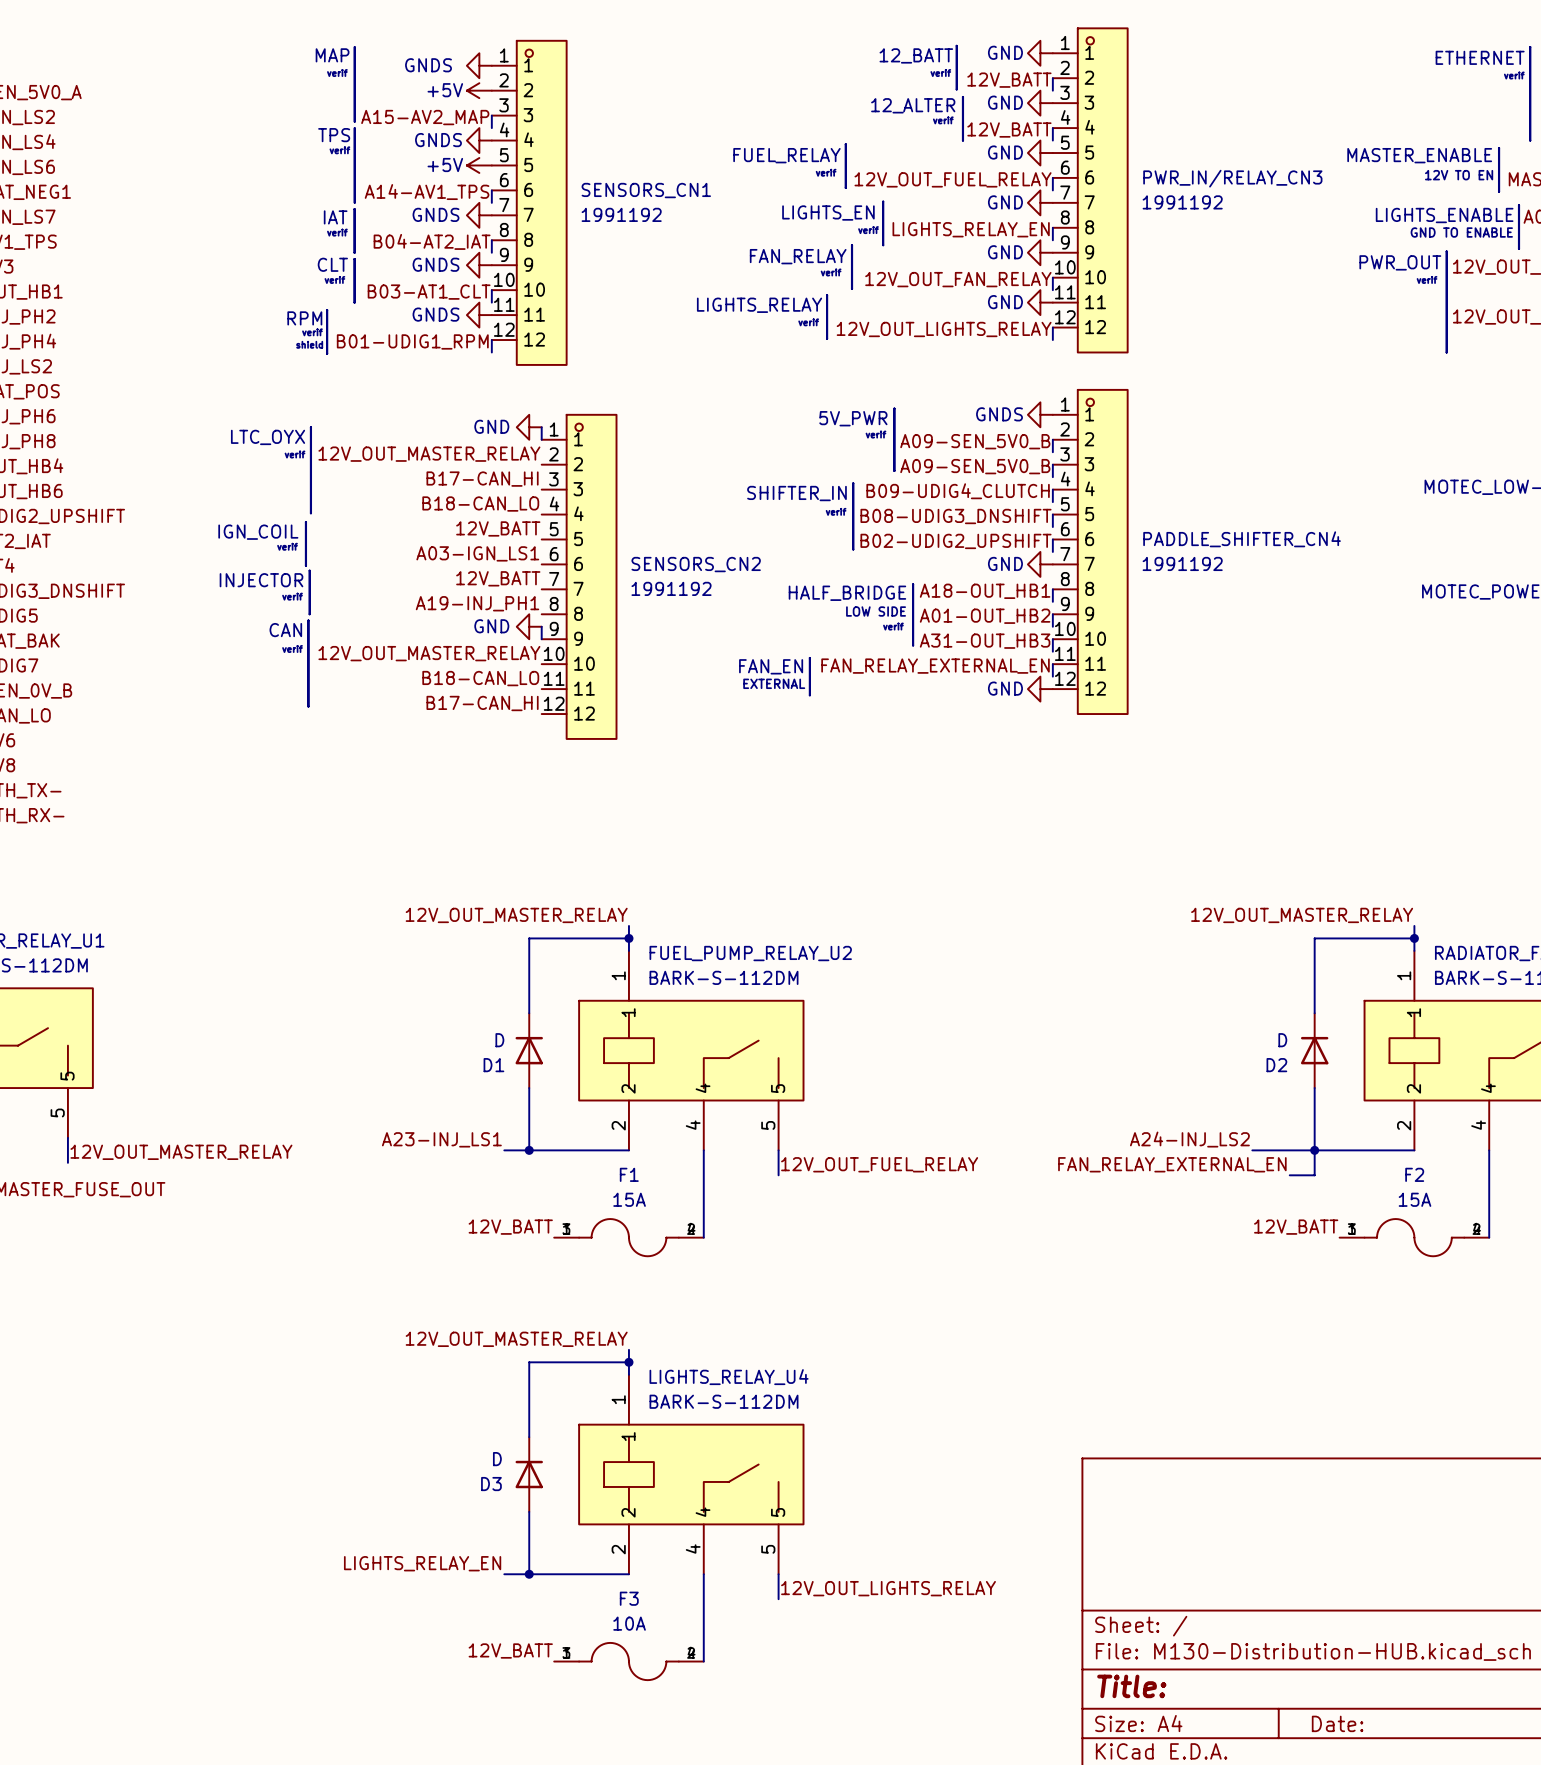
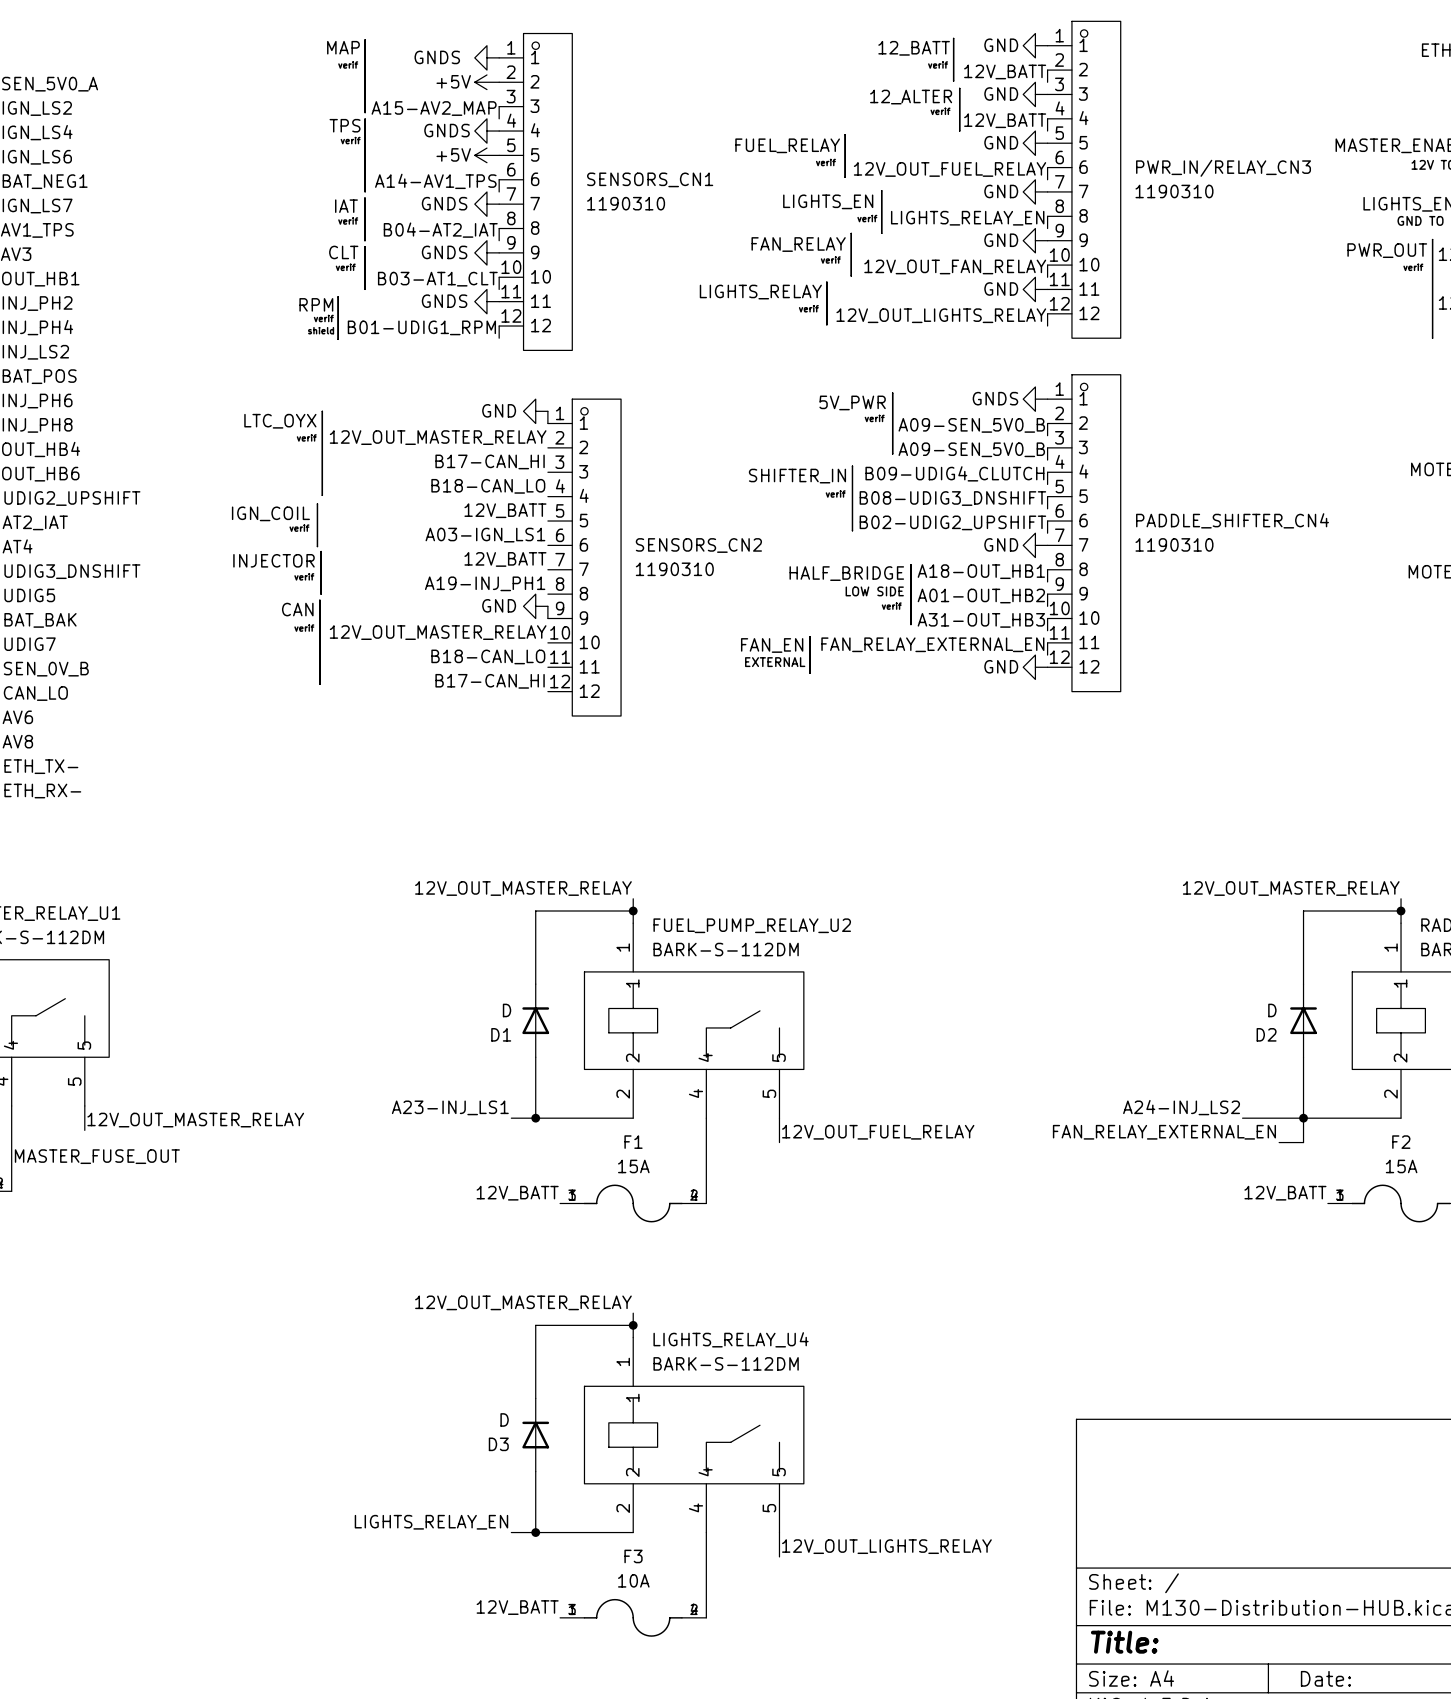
PWR_IN/RELAY_CN3 value: 1991192 (1182, 202) -> 1190310 (1174, 191)
SENSORS_CN1 value: 1991192 (621, 214) -> 1190310 (626, 203)
PADDLE_SHIFTER_CN4 value: 1991192 (1182, 563) -> 1190310 (1174, 544)
SENSORS_CN2 value: 1991192 (671, 588) -> 1190310 (674, 569)

